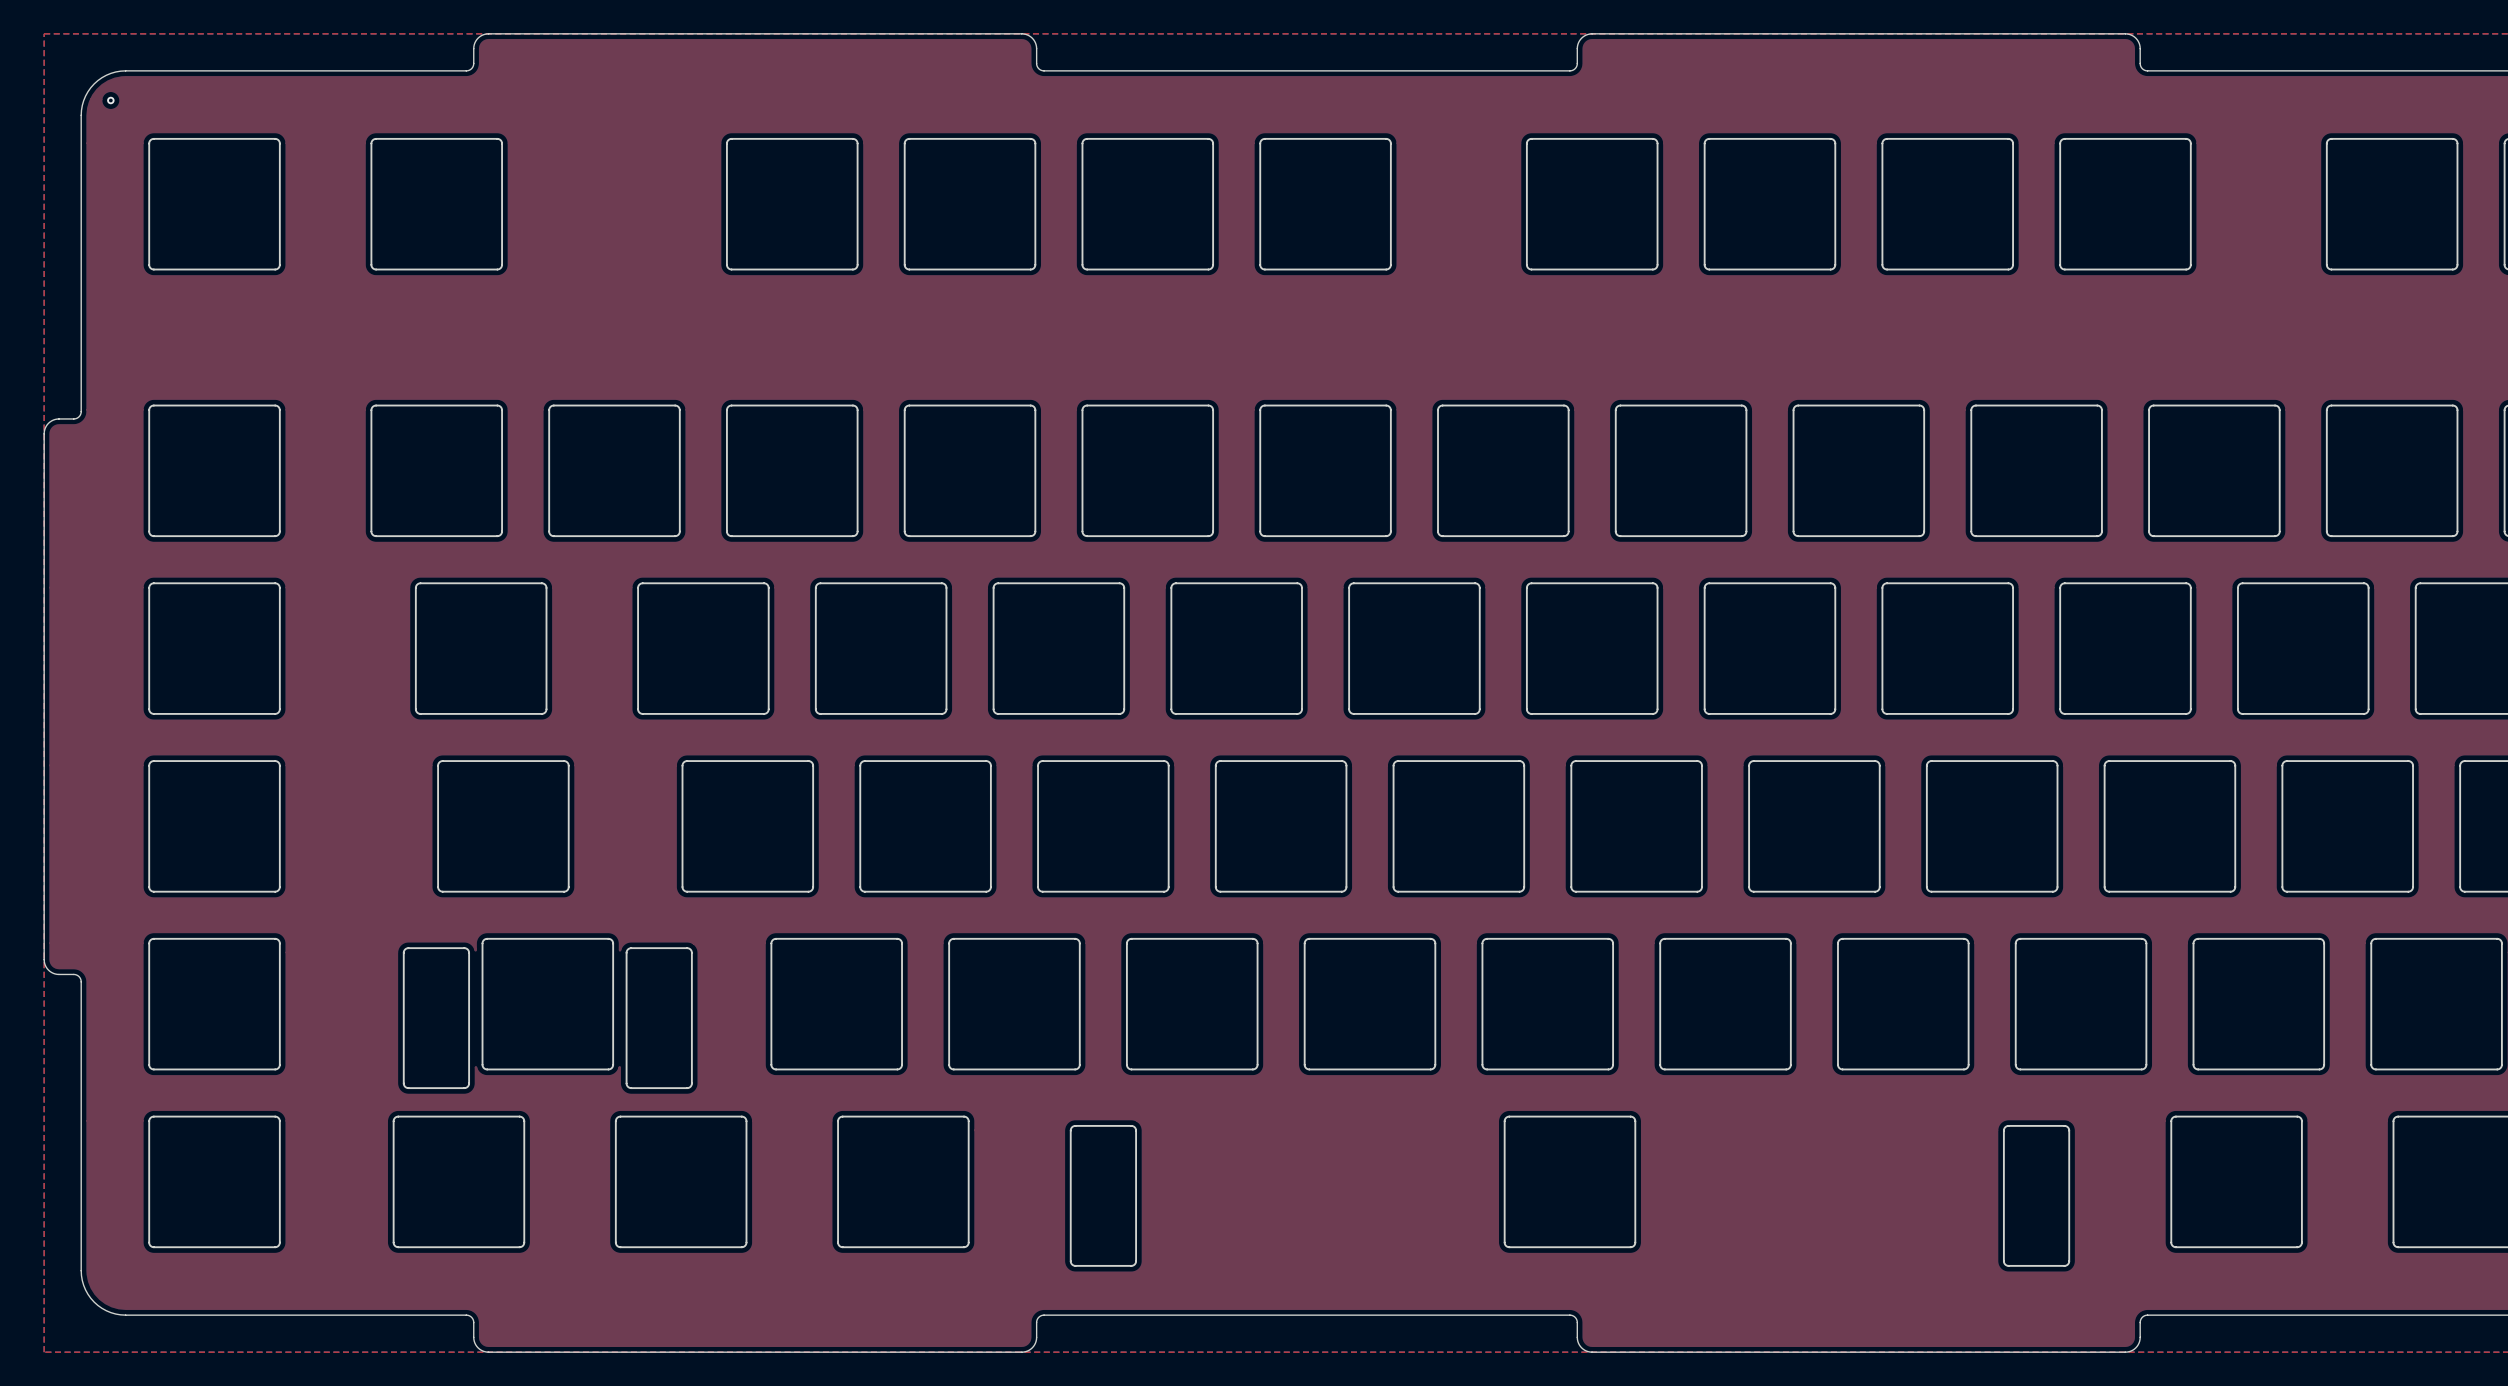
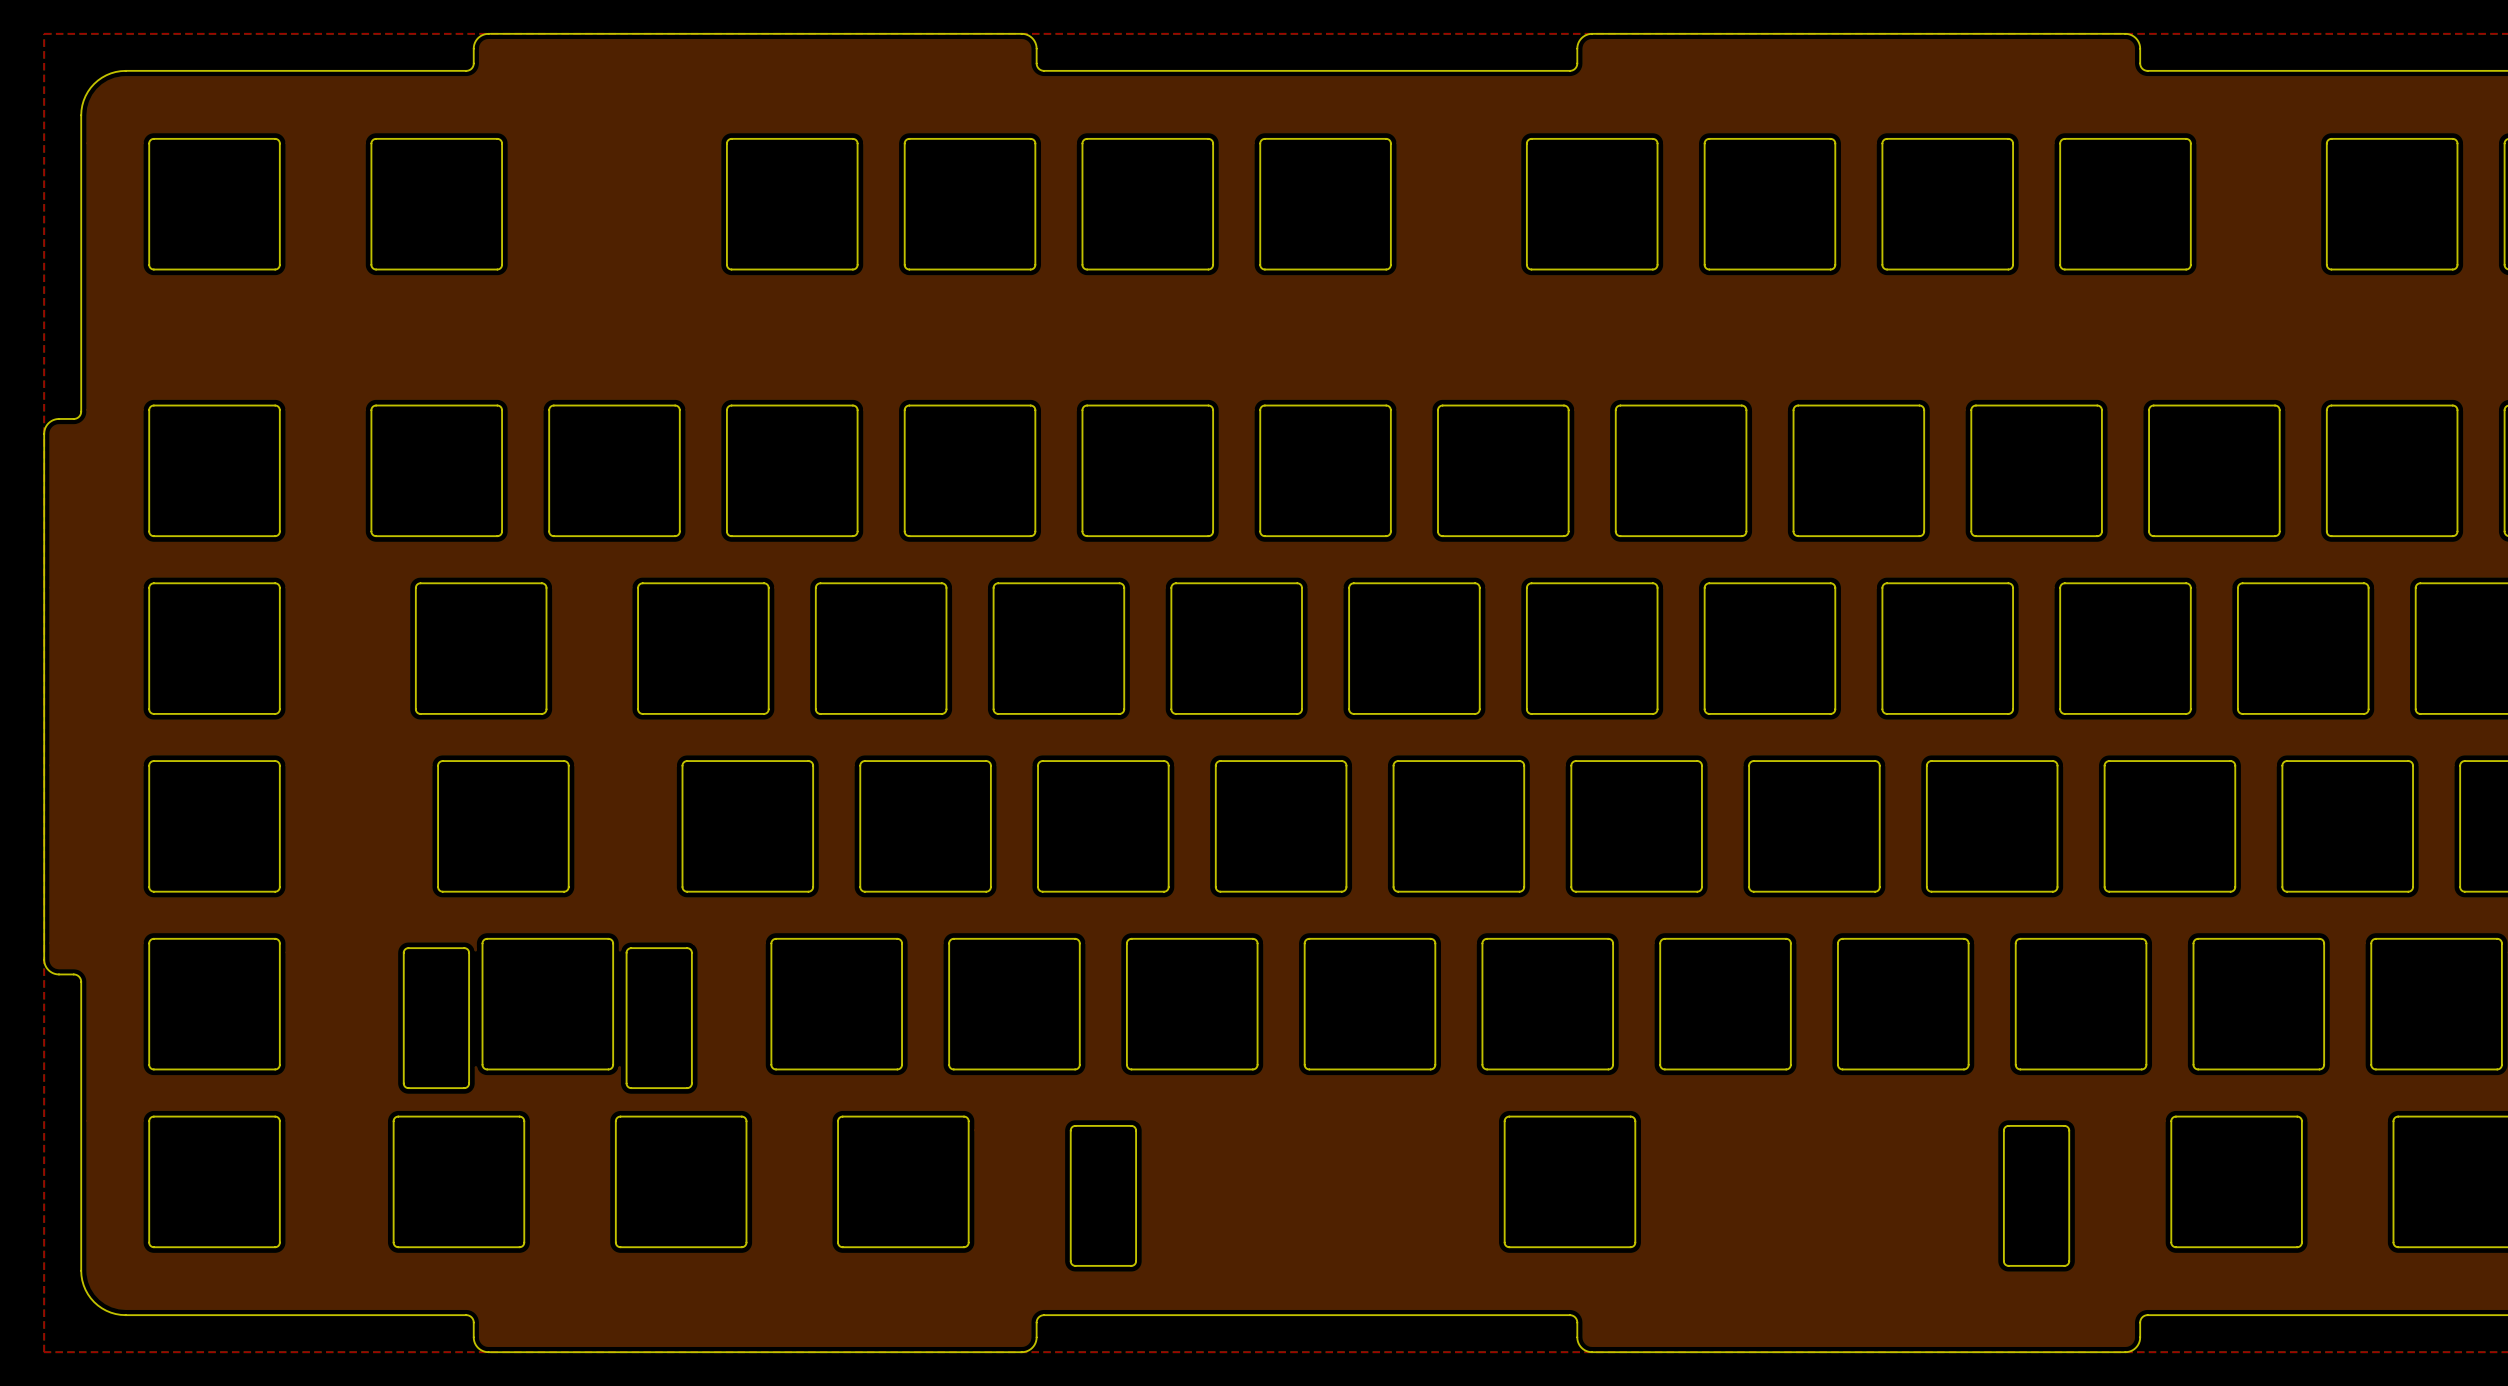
via: (110, 100) -> none

